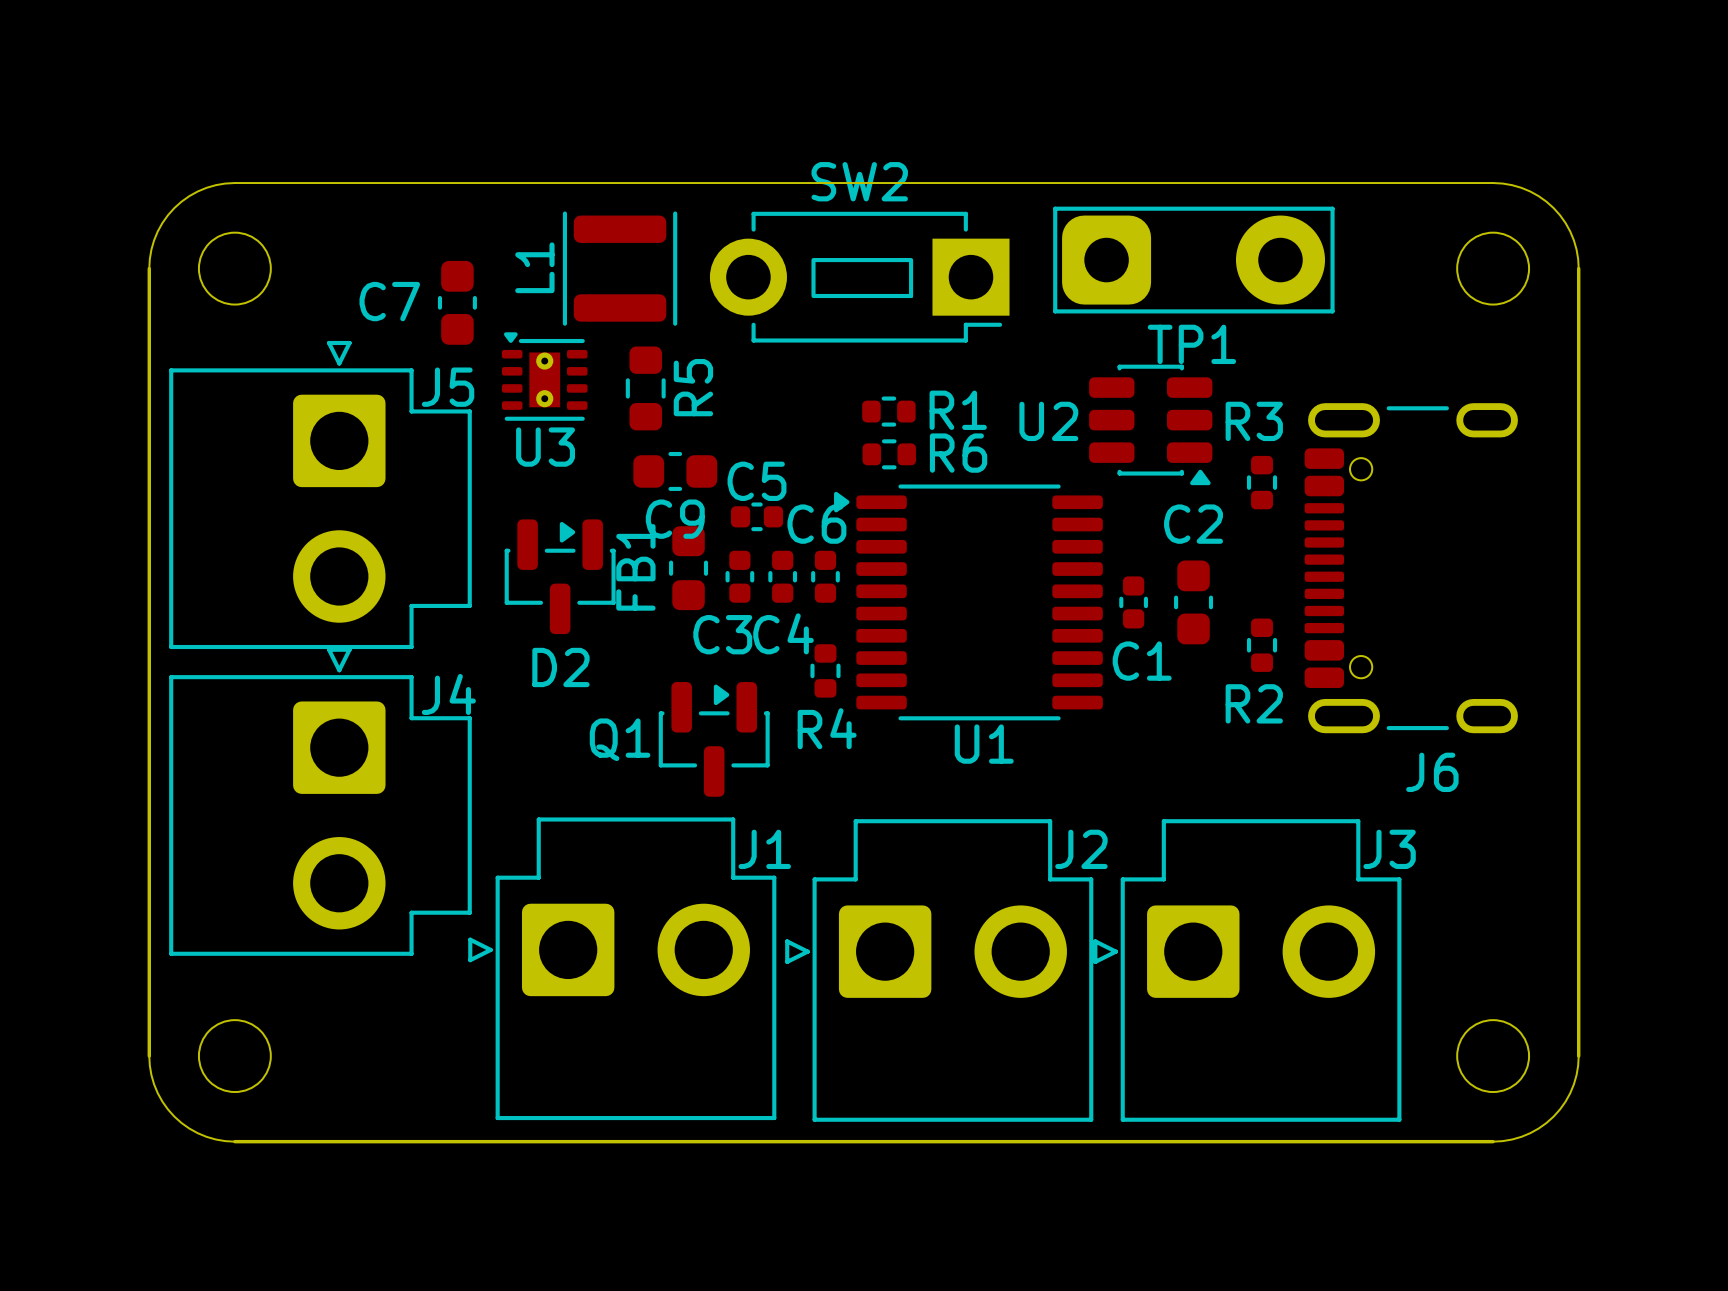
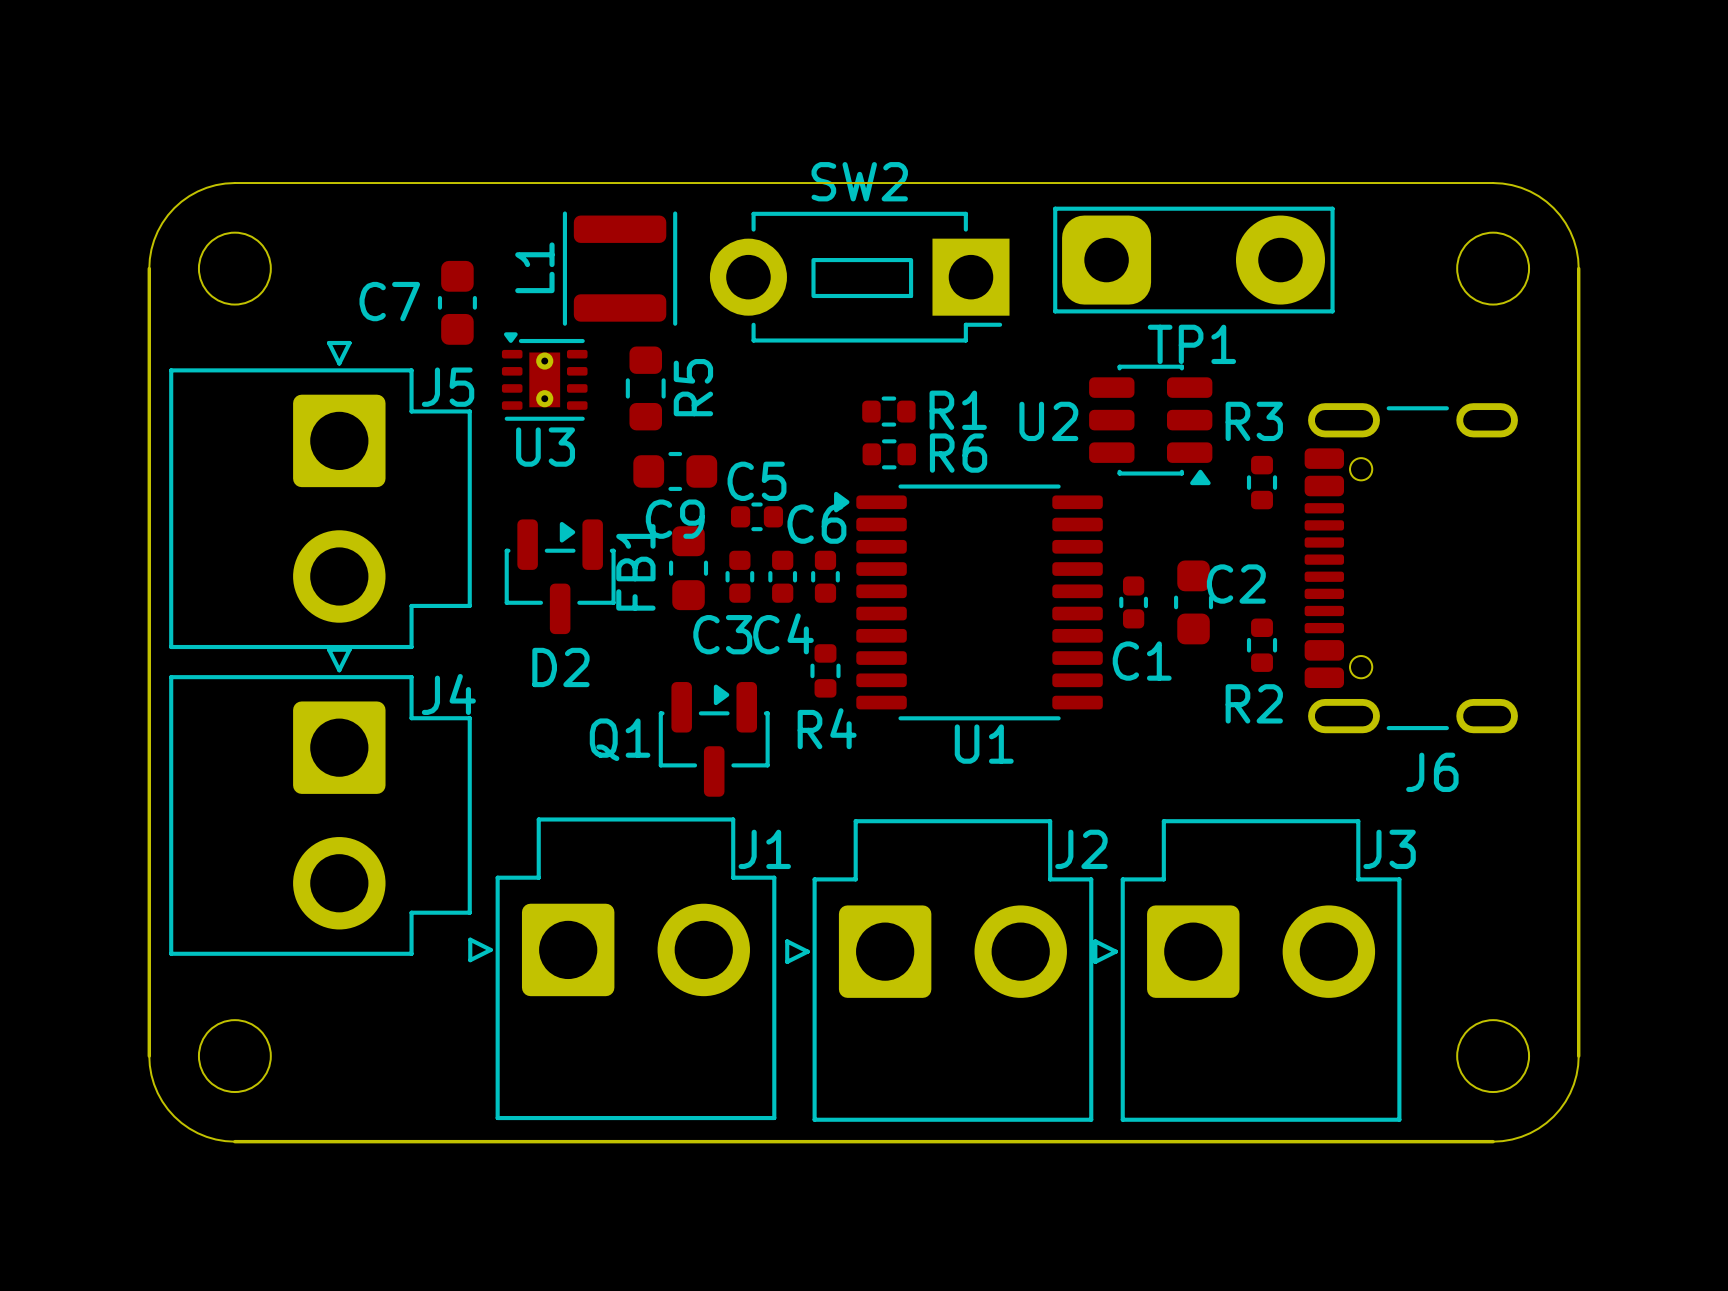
C2 name position: C2 (1193, 524) -> C2 (1236, 584)

